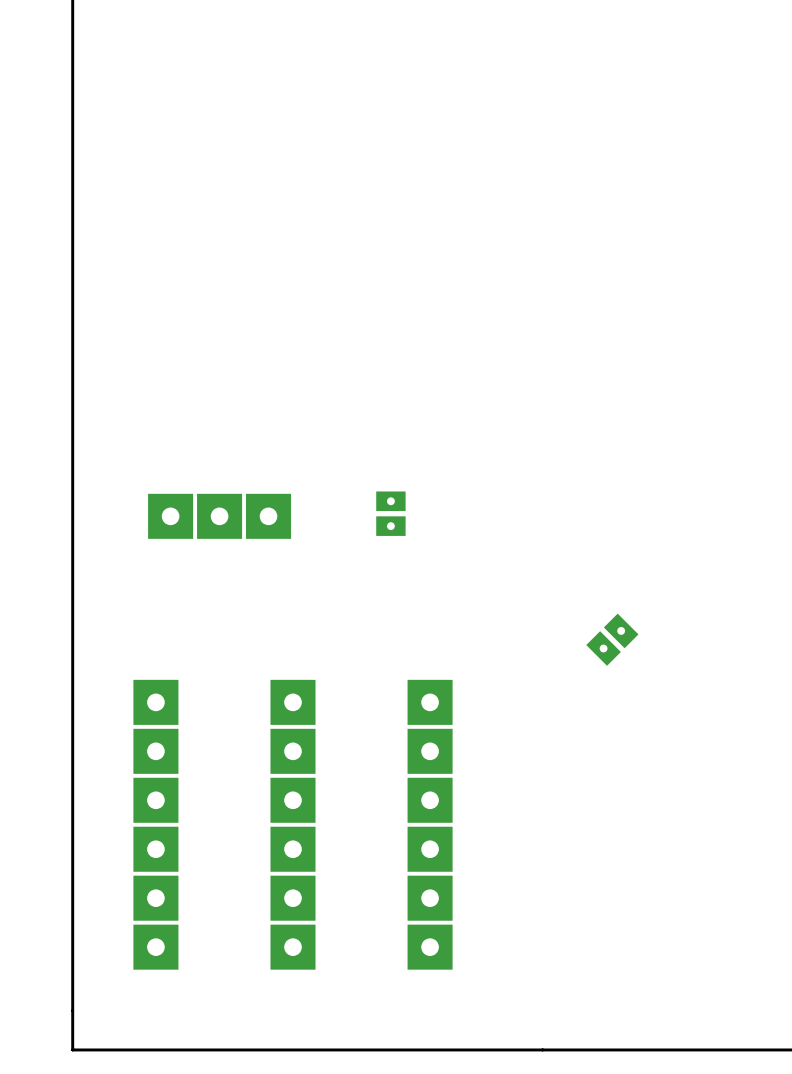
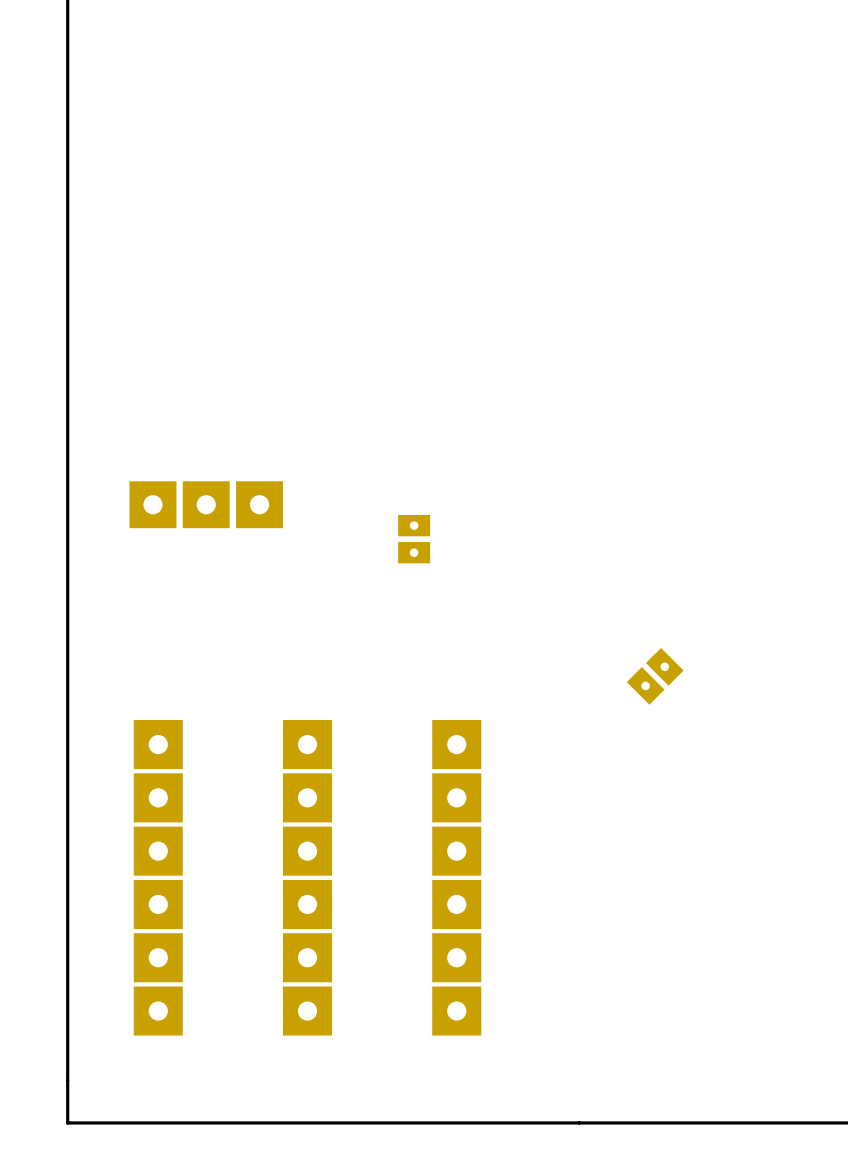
part: none -> (206, 504)
part: (219, 516) -> none

